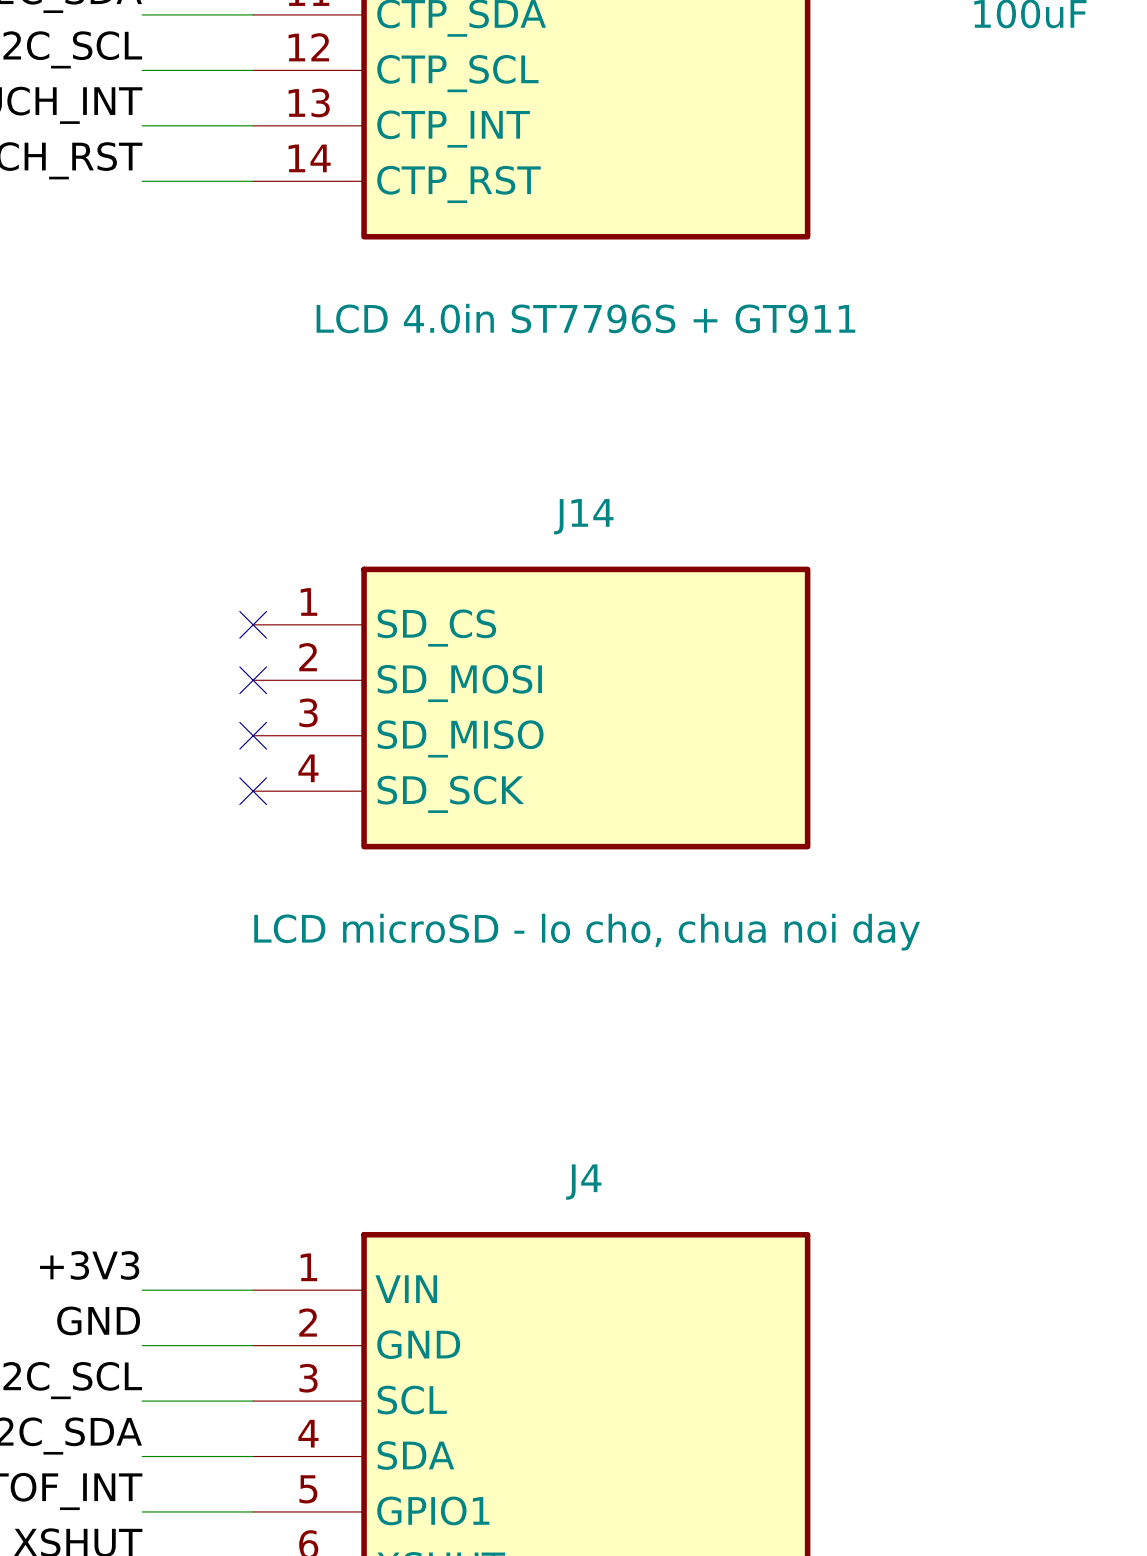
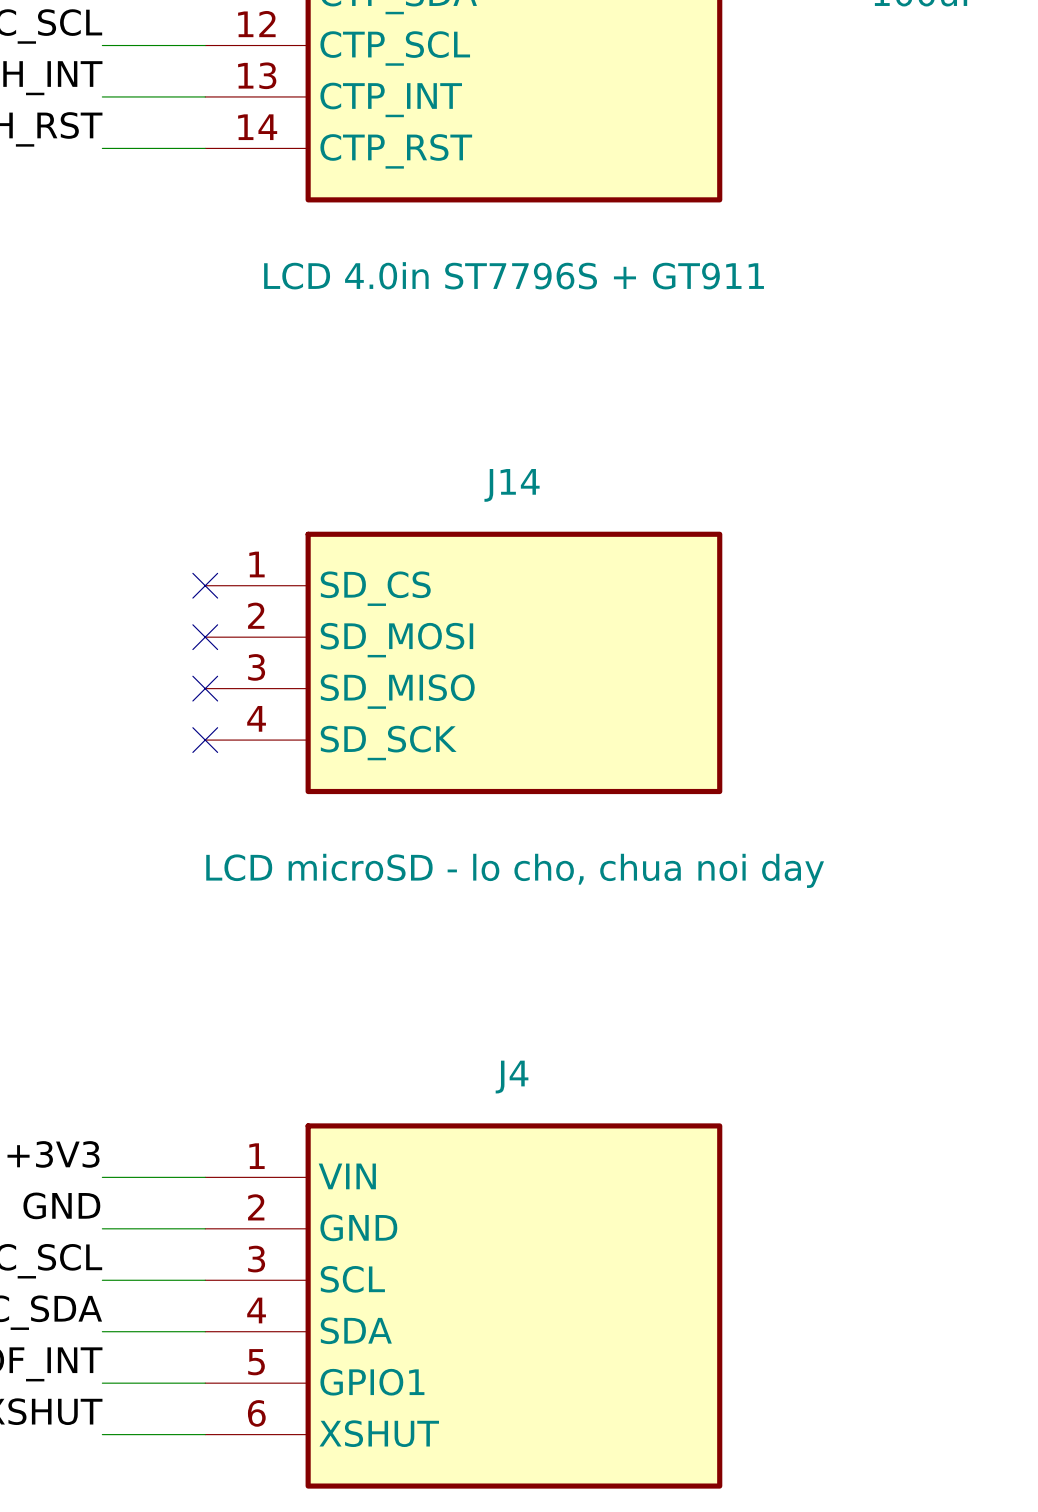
no-connect mark: (253, 624) -> none
no-connect mark: none -> (205, 585)
no-connect mark: (253, 680) -> none
no-connect mark: none -> (205, 637)
J14 position: (531, 708) -> (463, 662)
no-connect mark: (253, 735) -> none
no-connect mark: none -> (205, 688)
no-connect mark: (253, 791) -> none
no-connect mark: none -> (205, 740)

